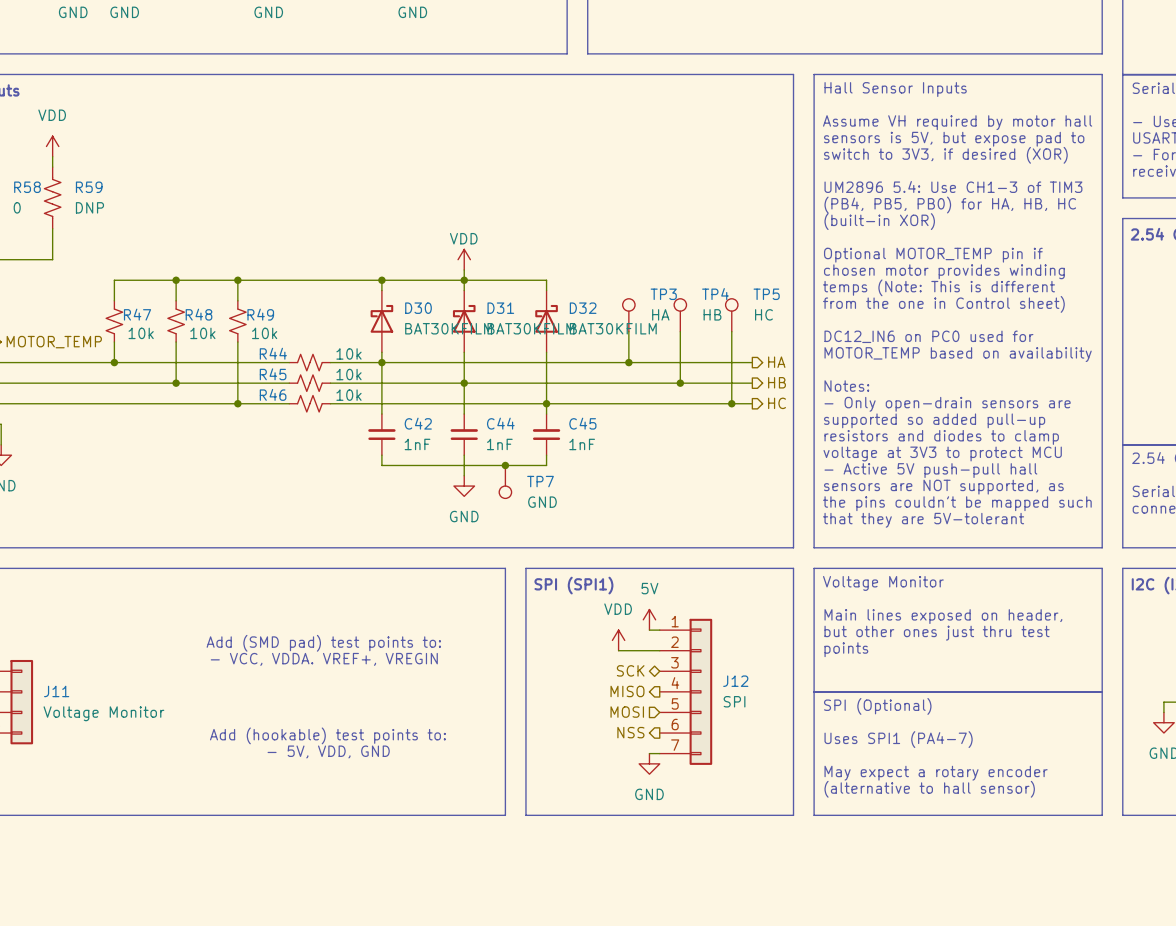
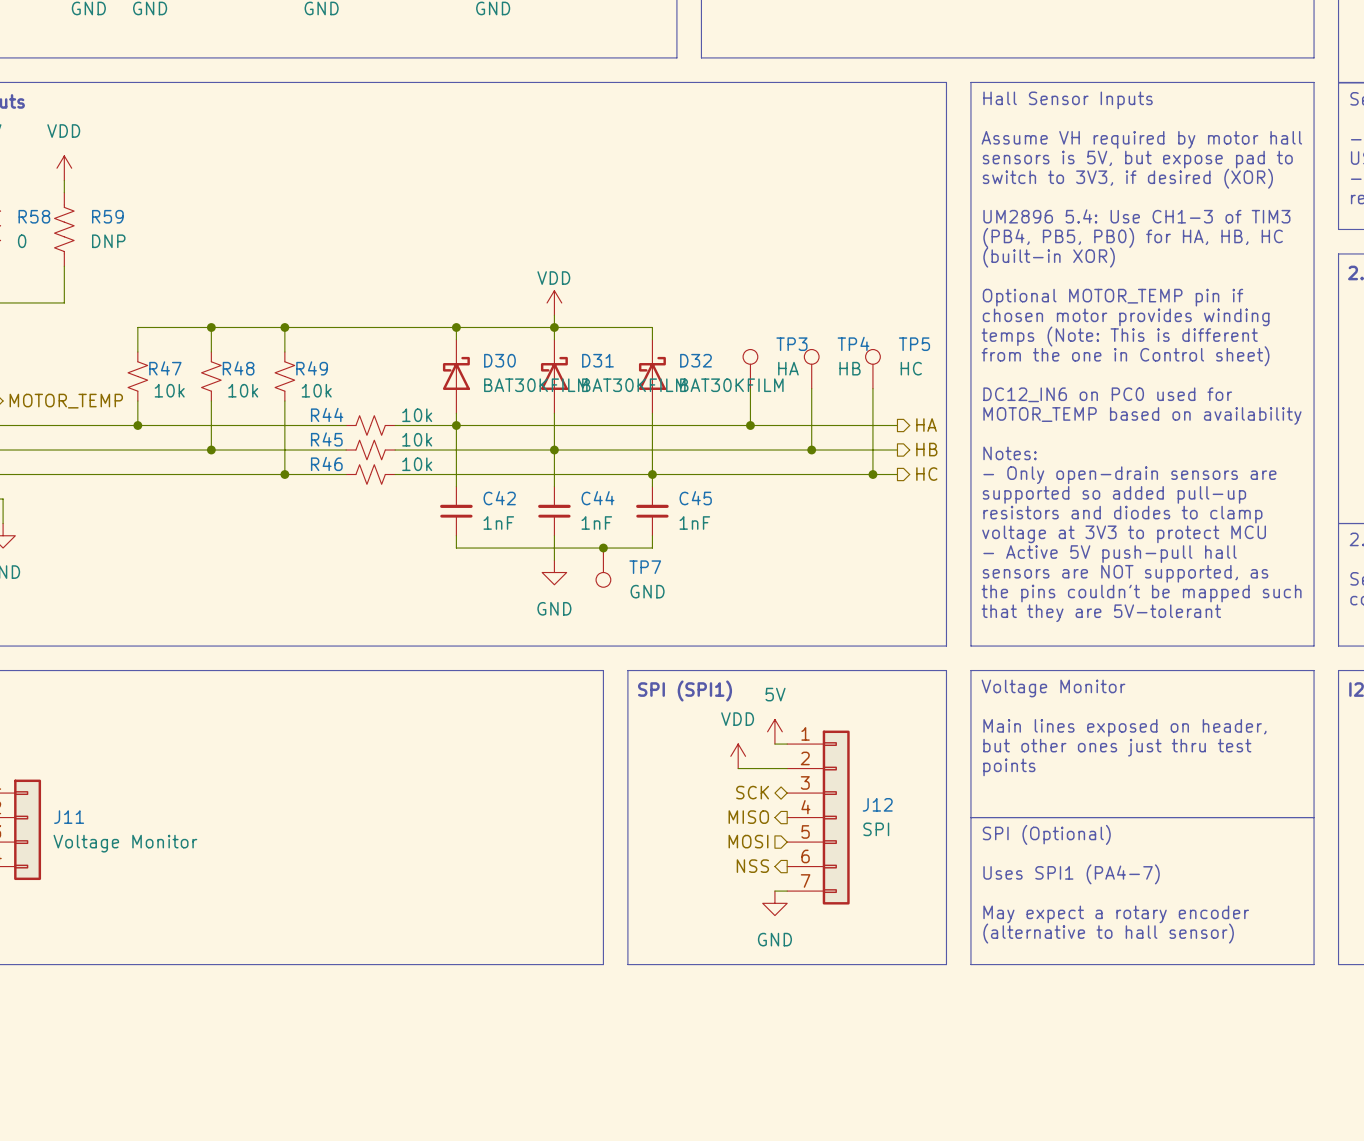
text: Add (SMD pad) test points to: (323, 643) -> none
text: - VCC, VDDA. VREF+, VREGIN (324, 659) -> none
text: Add (hookable) test points to: (327, 735) -> none
text: - 5V, VDD, GND (328, 751) -> none

